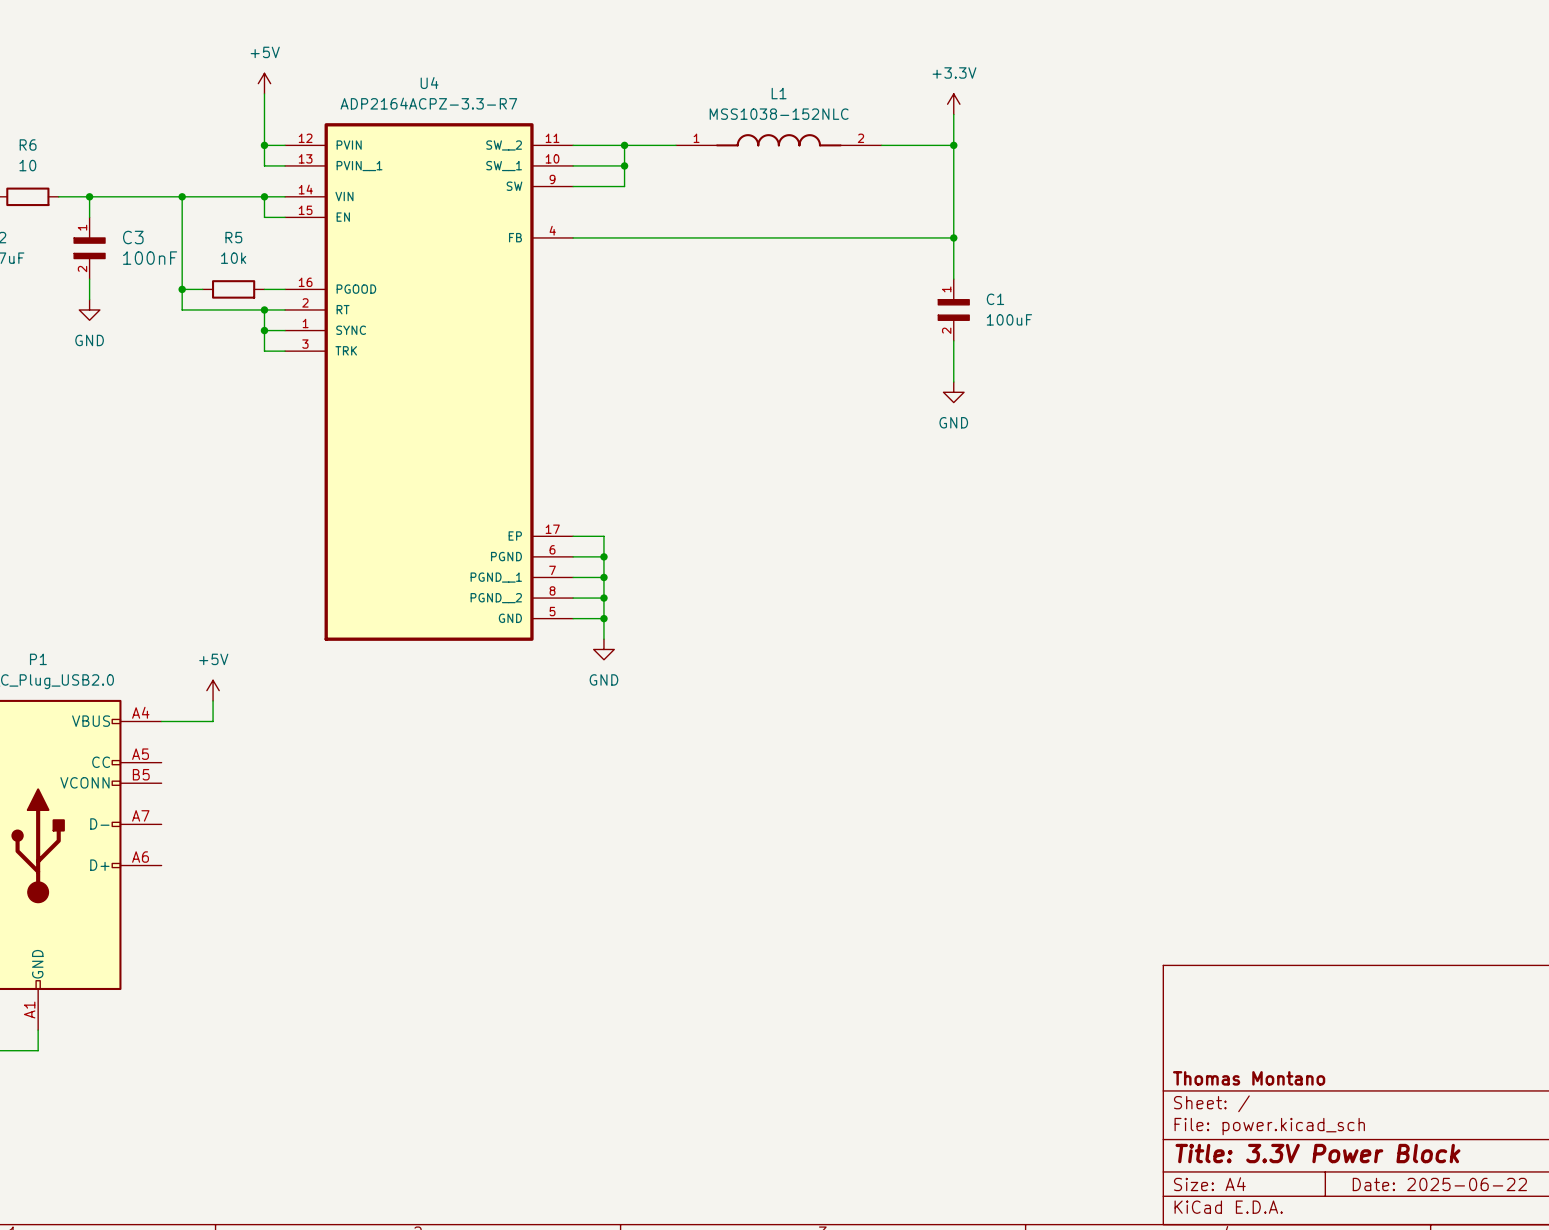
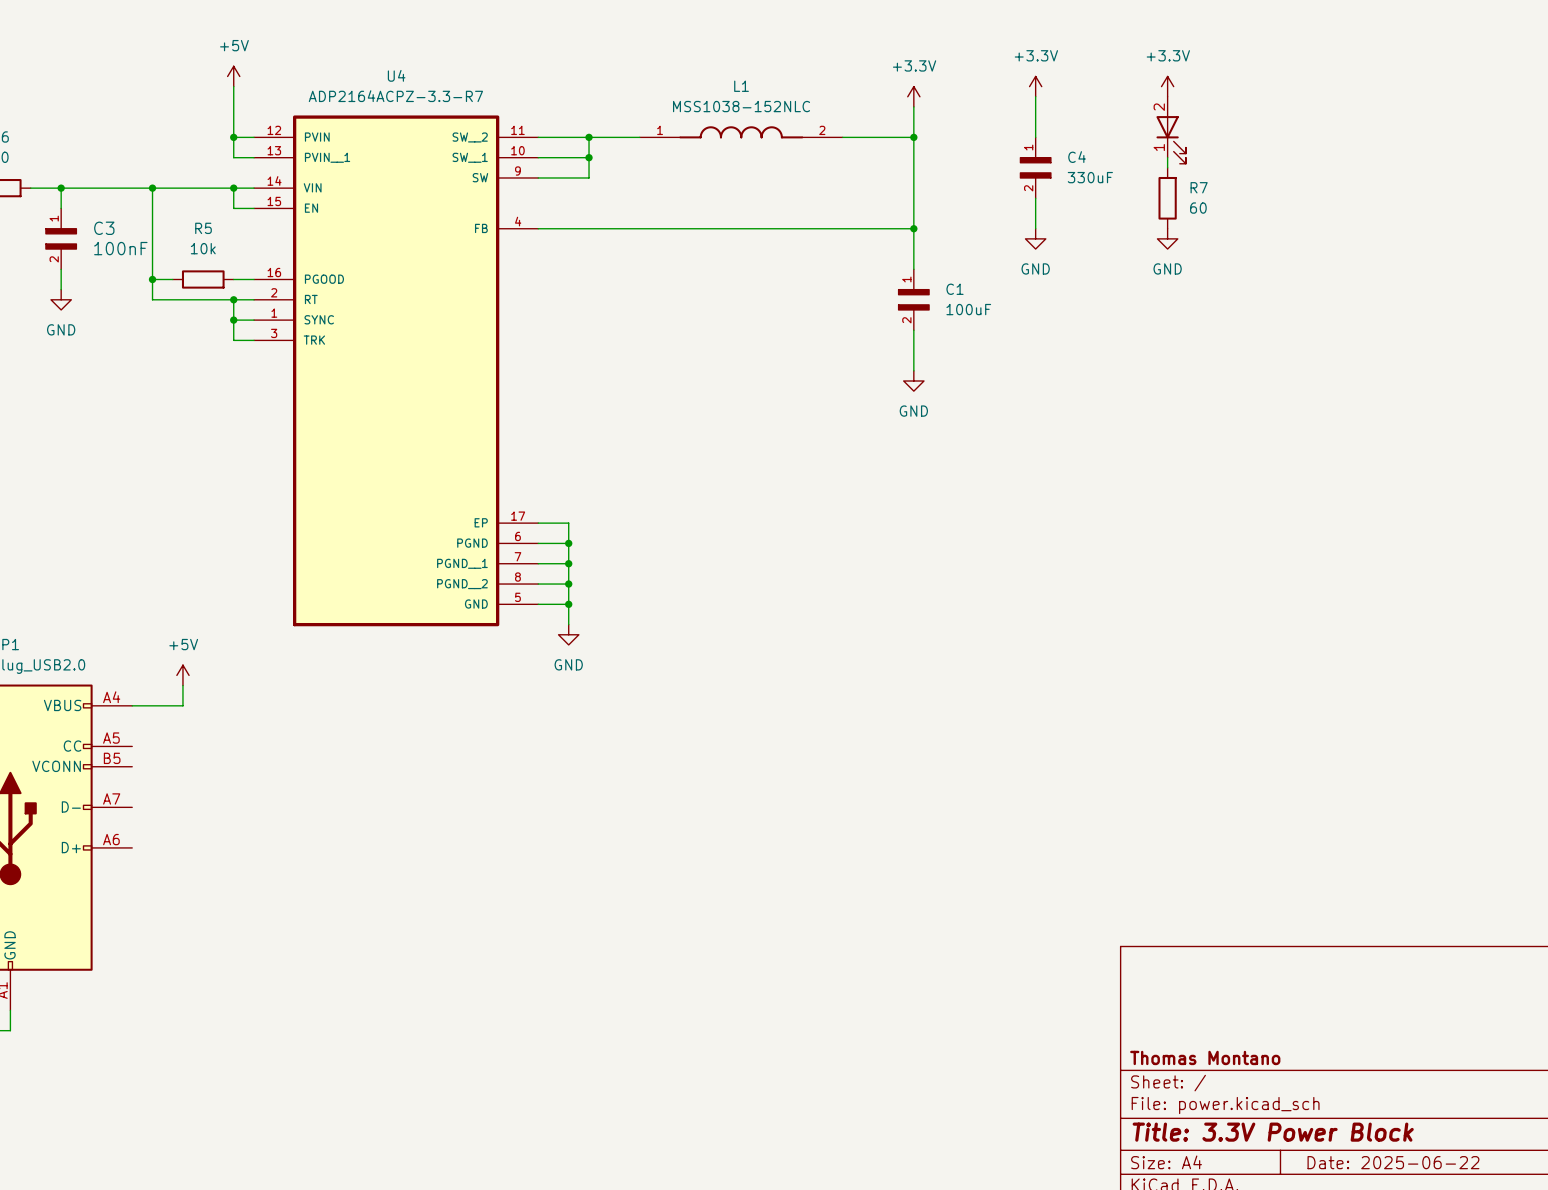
power symbol: none -> +3.3V (1035, 86)
power symbol: none -> +3.3V (1167, 86)
wire: none -> (1035, 96) (1035, 137)
part: none -> (1171, 130)
wire: none -> (1167, 157) (1167, 167)
C4: none -> 330uF (1035, 167)
wire: none -> (1035, 198) (1035, 228)
R7: none -> 60 (1167, 198)
power symbol: none -> GND (1035, 238)
power symbol: none -> GND (1167, 238)

